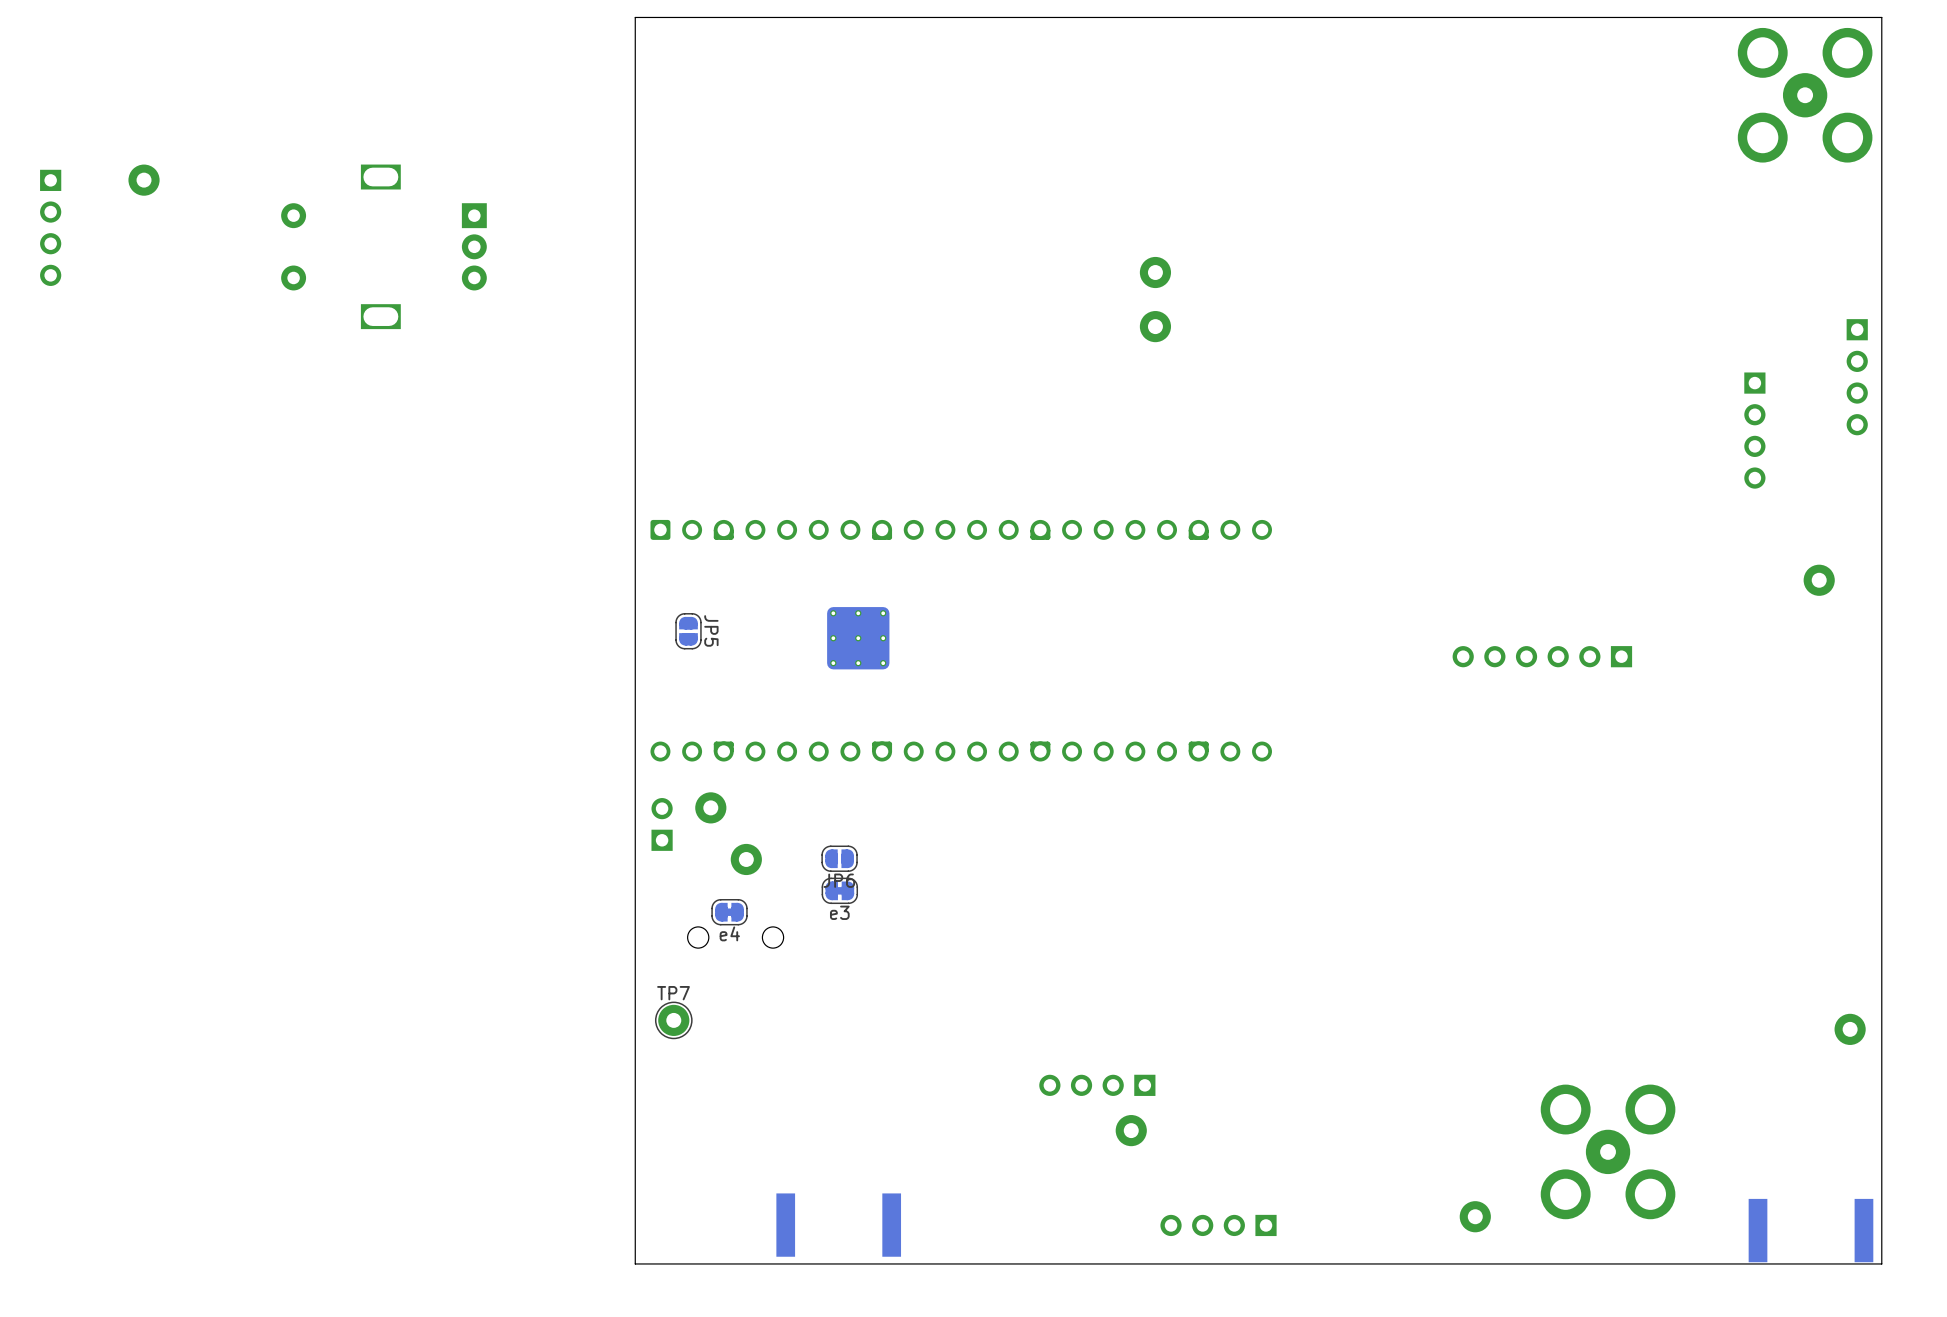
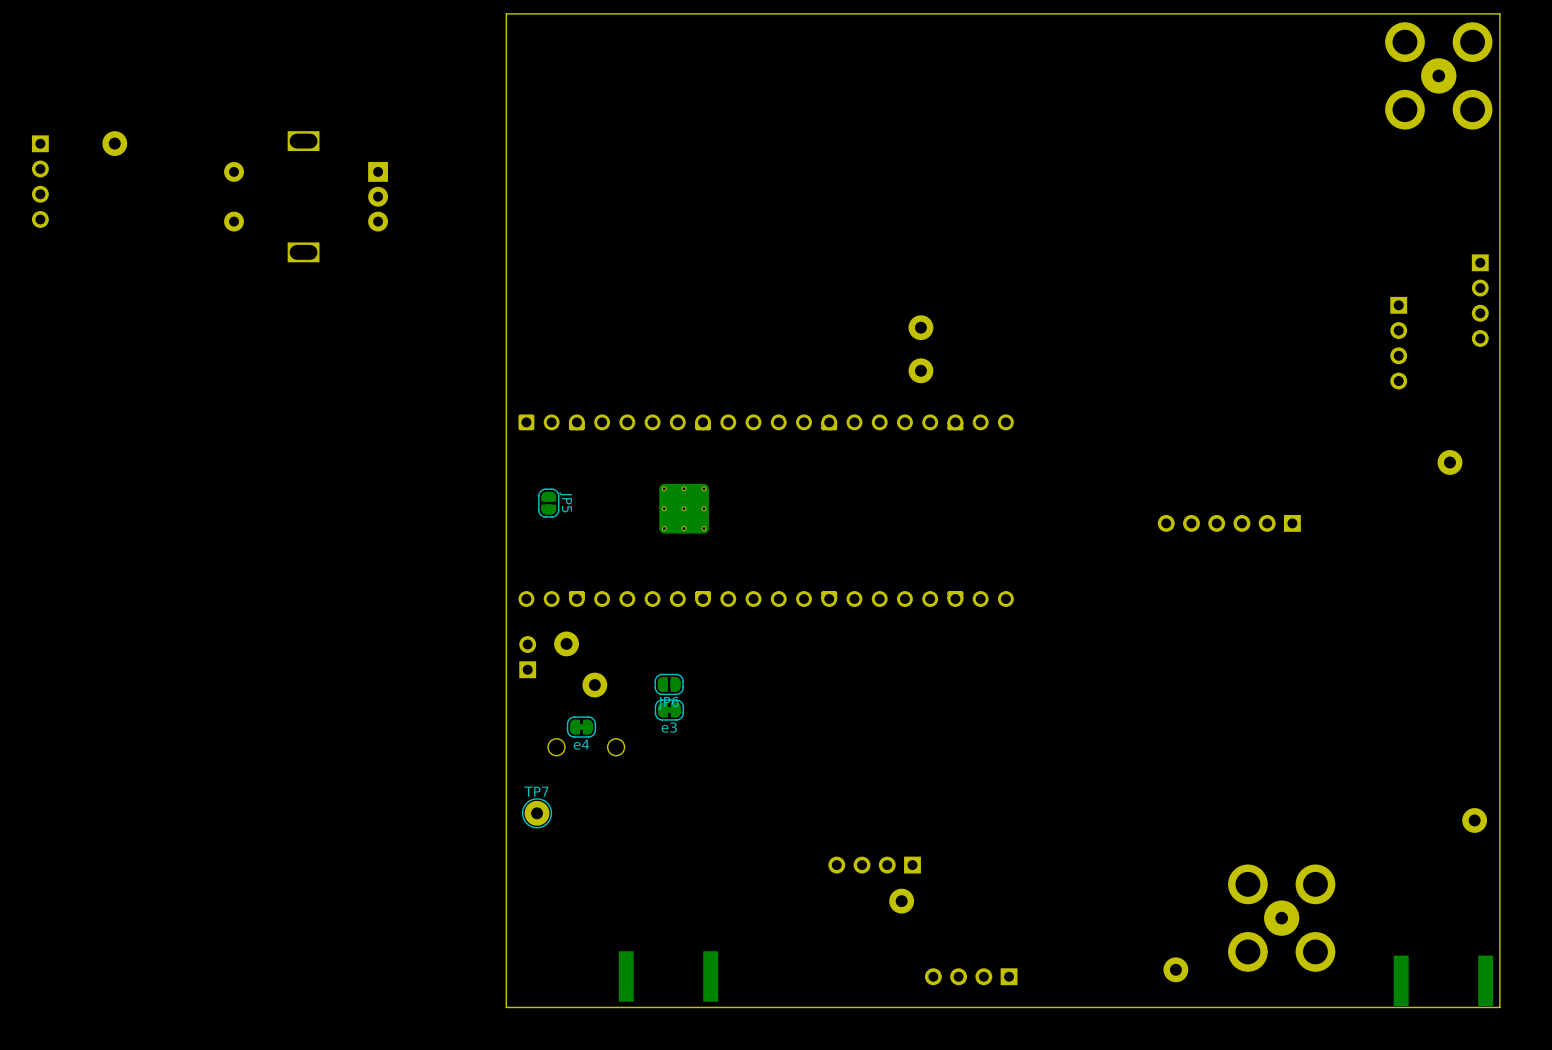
part: (1155, 272) -> none
part: (1155, 326) -> none
part: none -> (920, 327)
part: none -> (920, 370)

